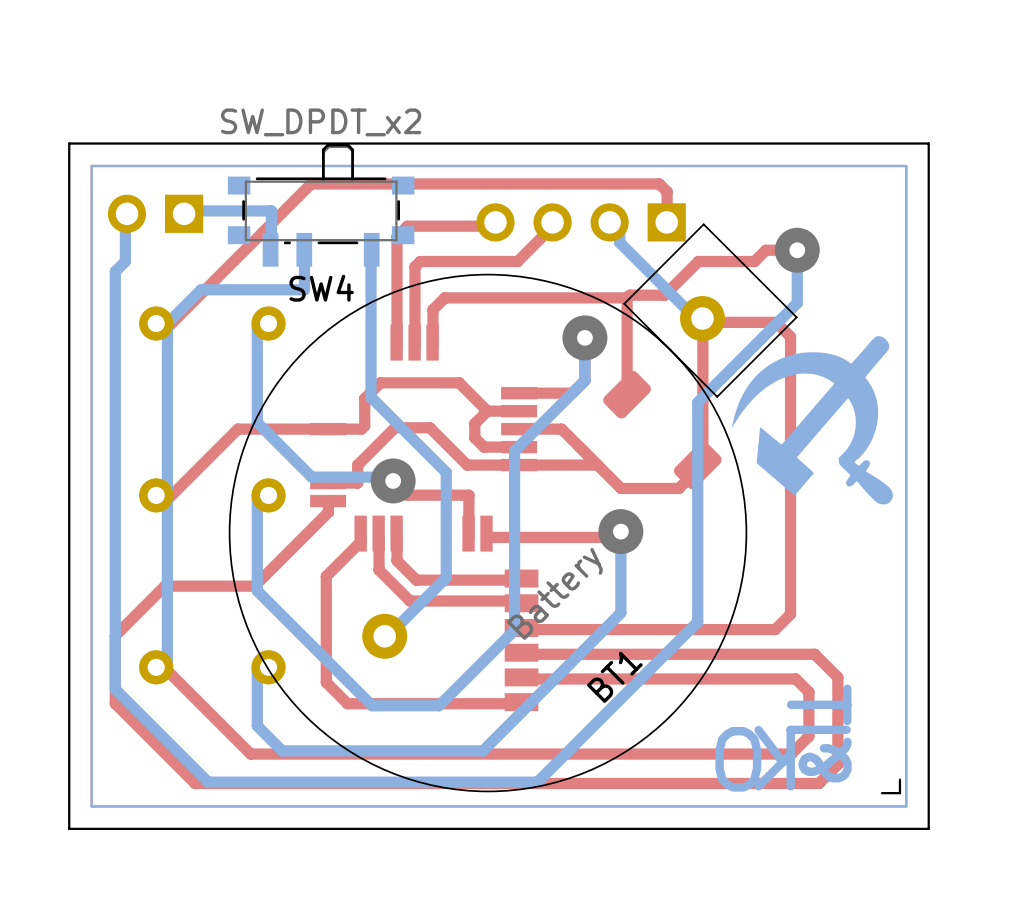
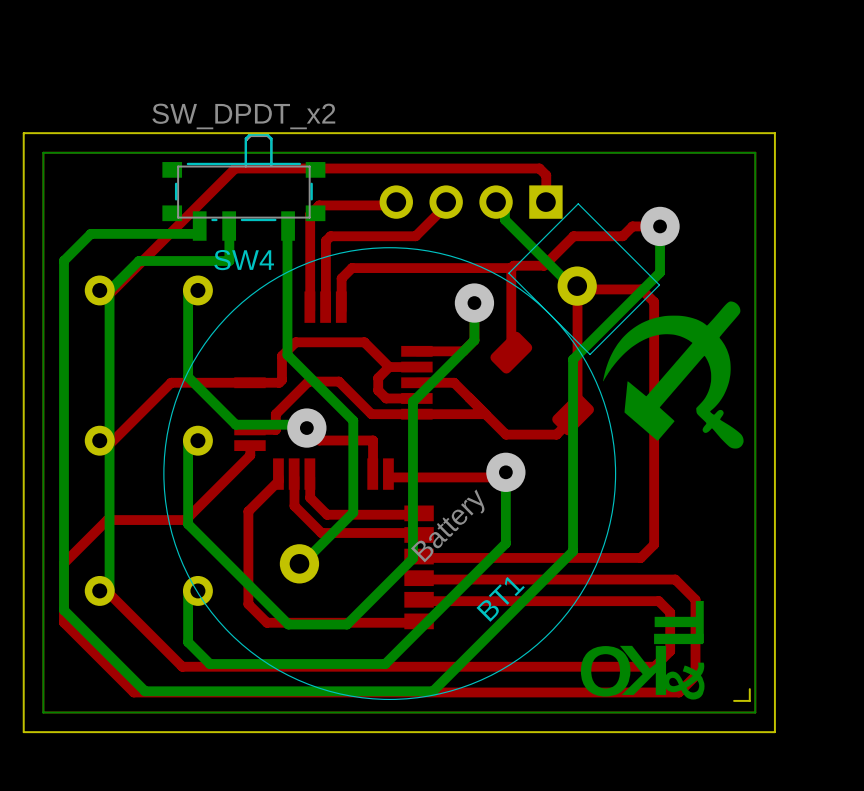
bottom track: (127, 213) (125, 215) (125, 261) (115, 271) (115, 289) -> (197, 233) (90, 233) (63, 260)
part: (155, 213) -> none
bottom track: (184, 213) (186, 210) (271, 210) (270, 249) -> none

